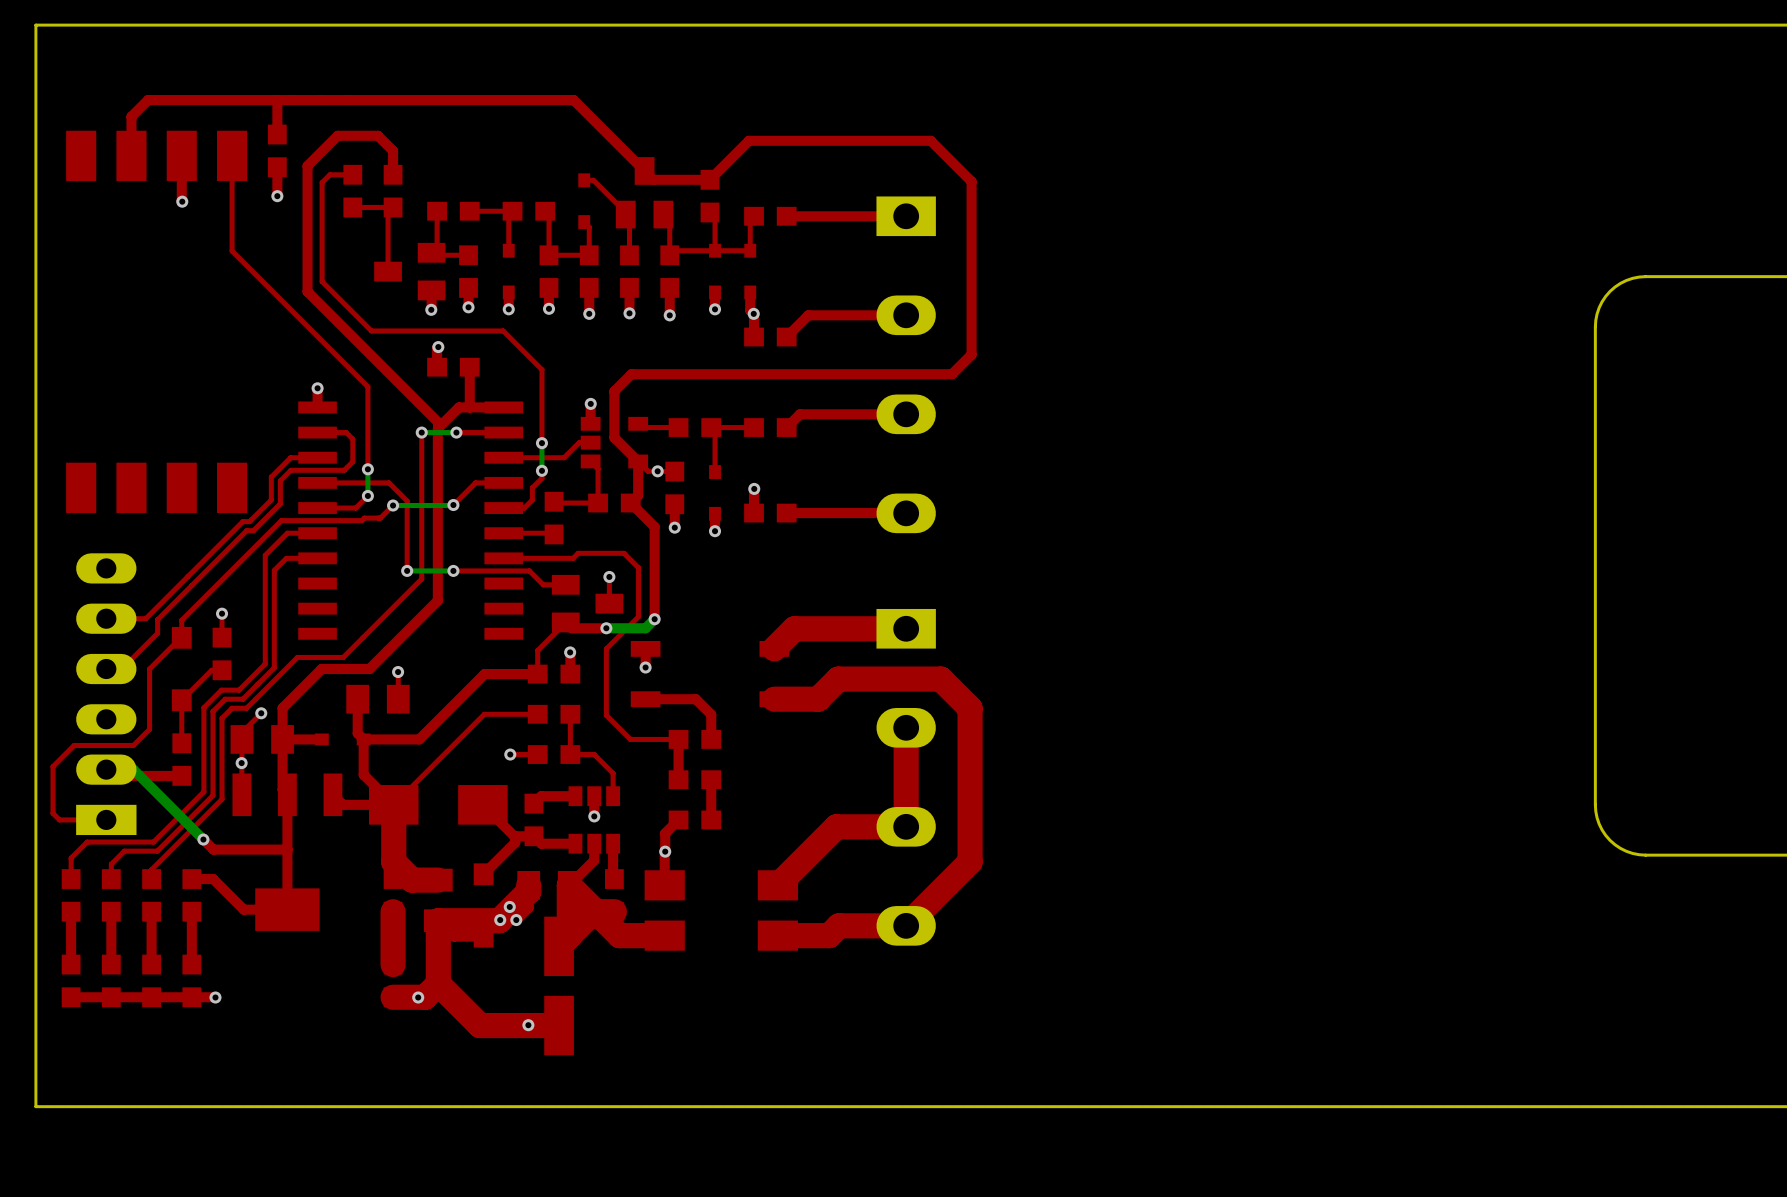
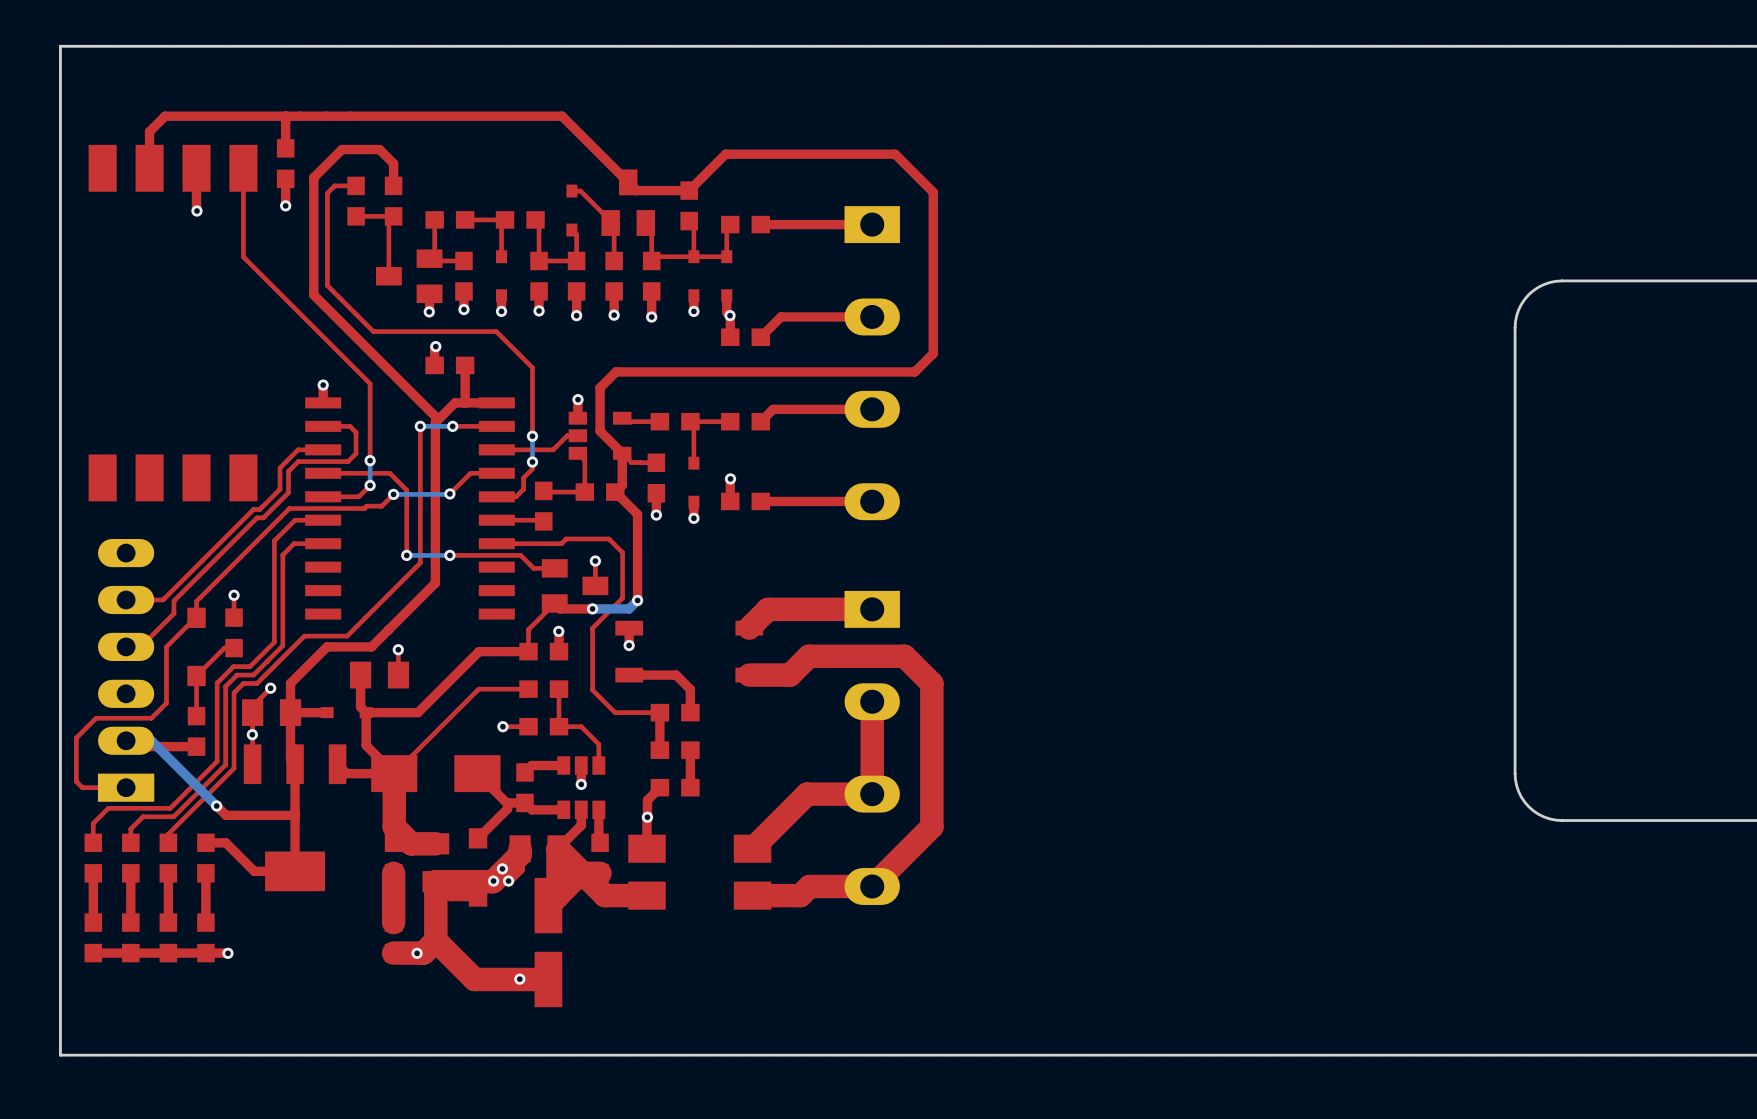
via: (657, 471) -> none

